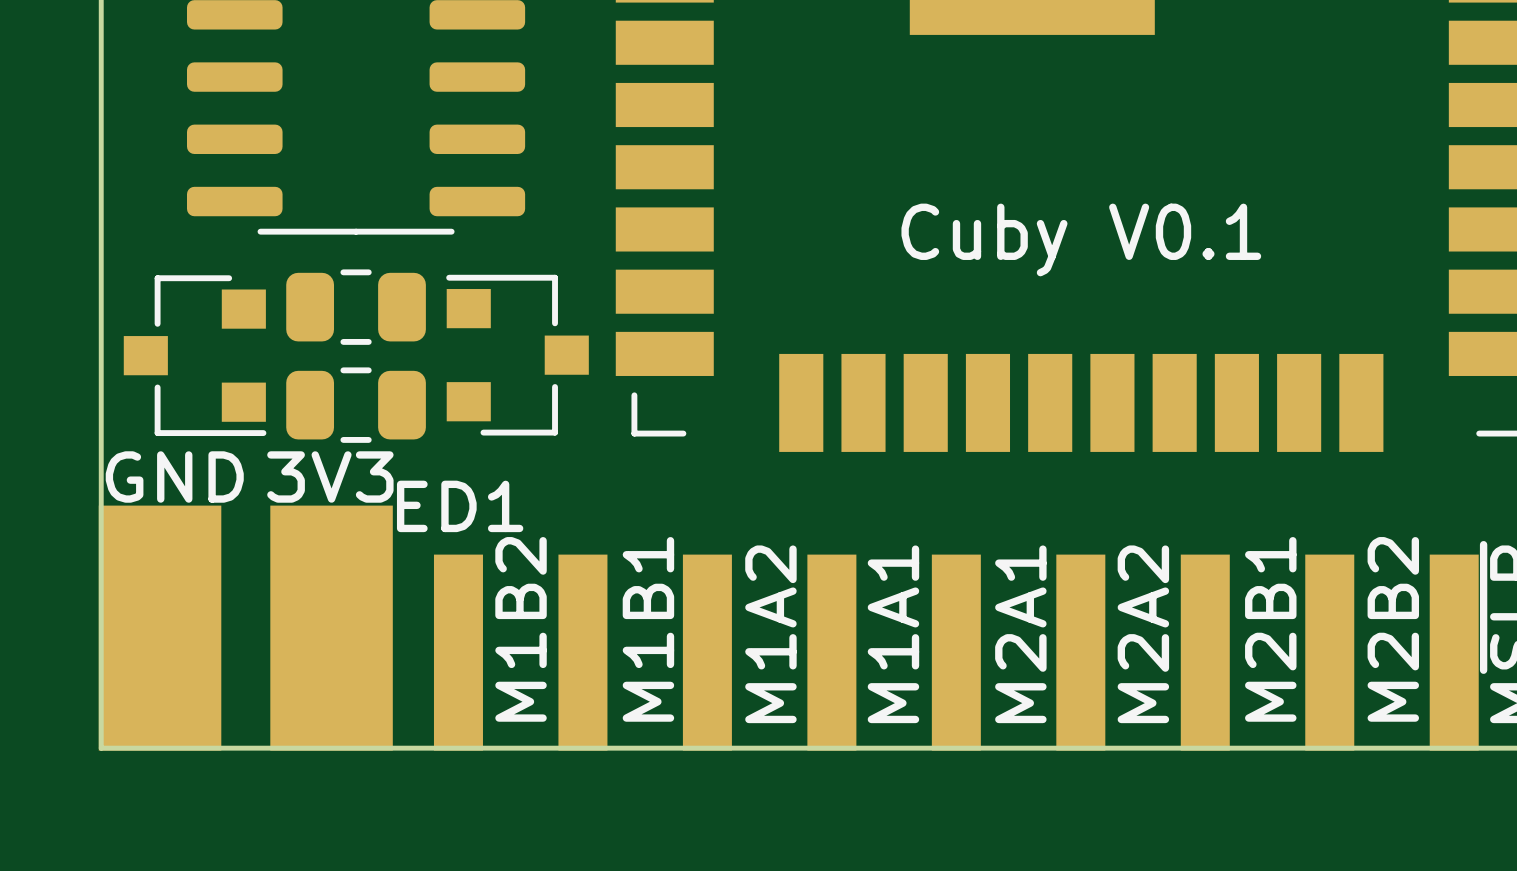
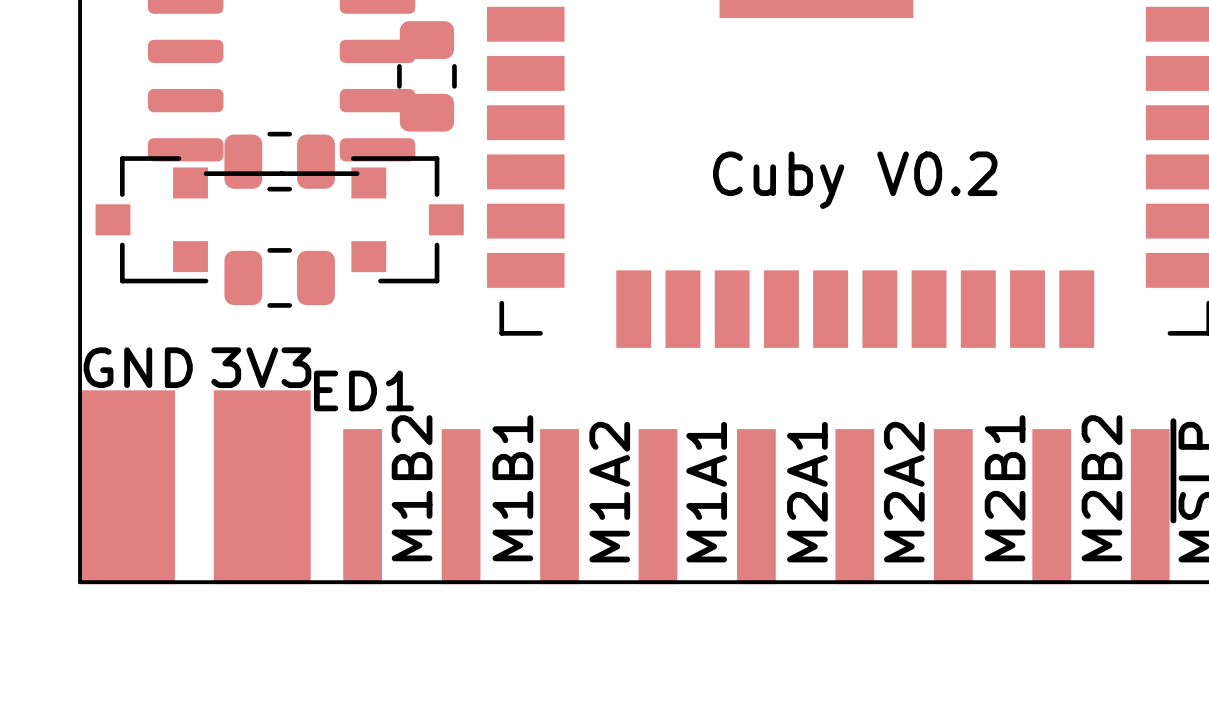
part: none -> (426, 76)
part: none -> (279, 161)
text: Cuby V0.1 (1081, 239) -> Cuby V0.2 (855, 180)
part: (356, 307) -> none
part position: (195, 355) -> (151, 219)
part position: (517, 355) -> (407, 219)
part: none -> (279, 277)
part: (356, 405) -> none

